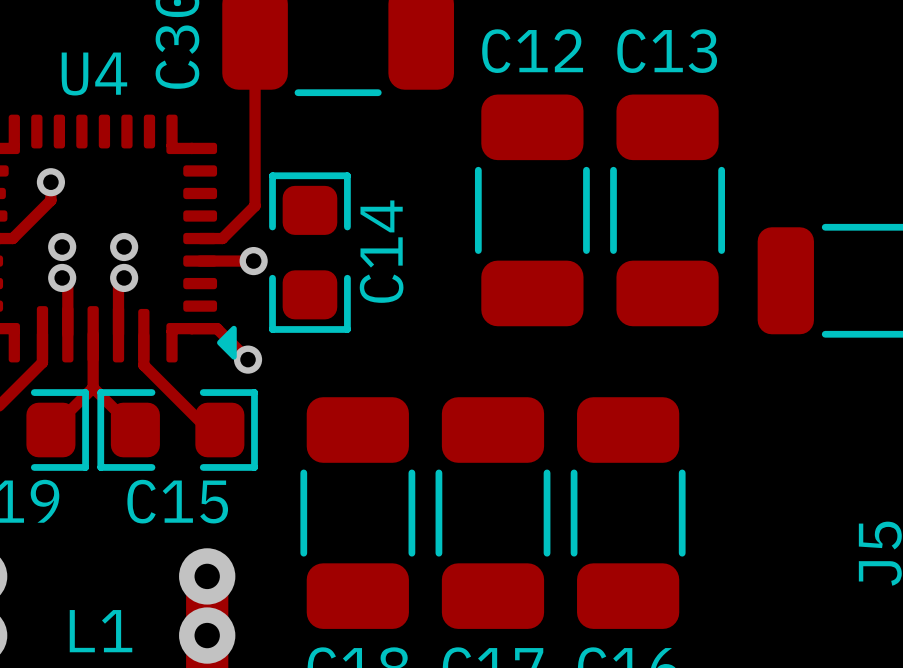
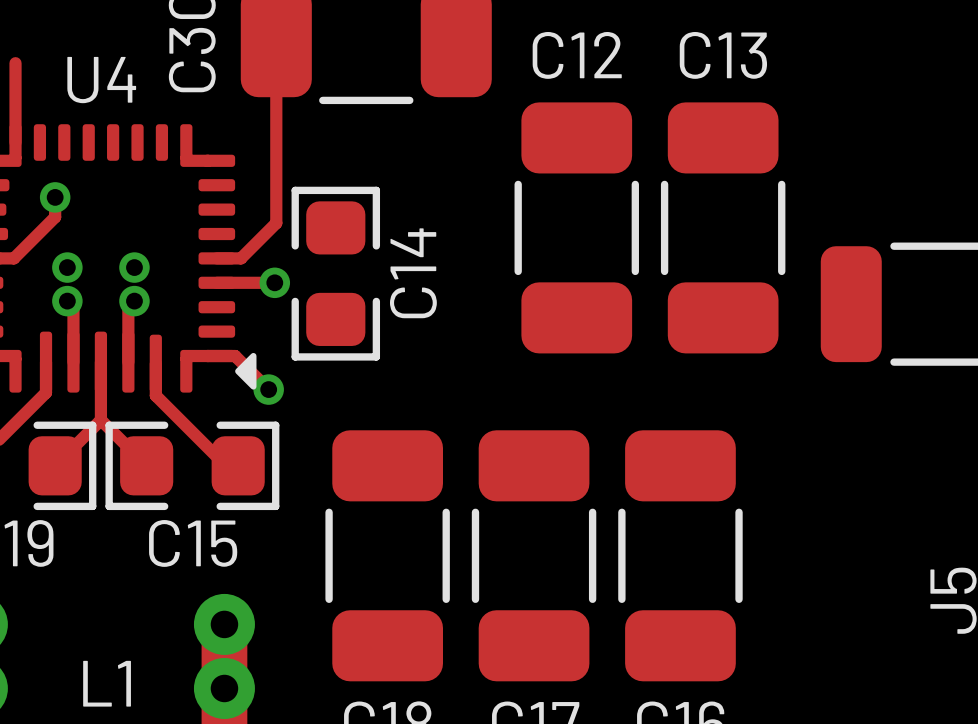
track: none -> (15, 63) (15, 142)

